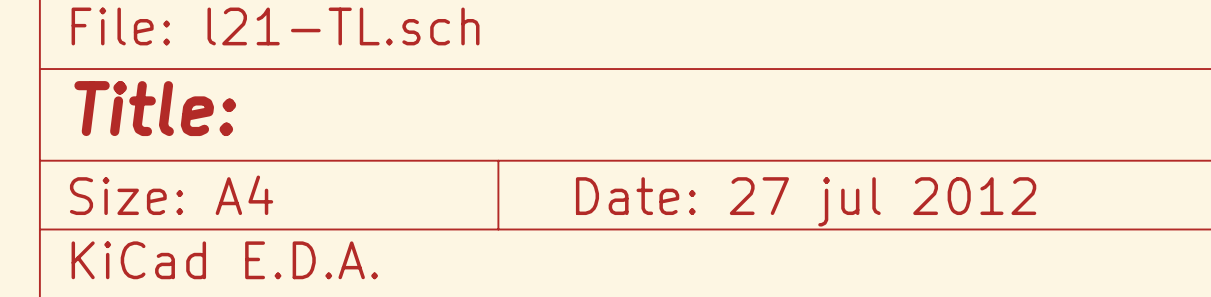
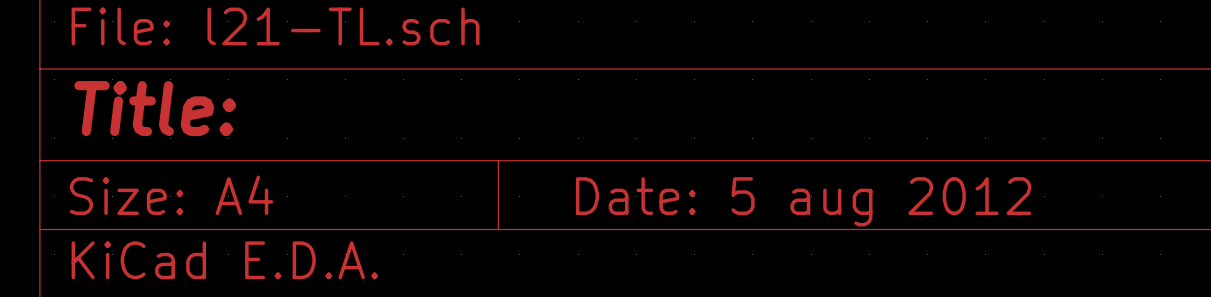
title block: Date: 27 jul 2012 (806, 201) -> Date: 5 aug 2012 (803, 201)

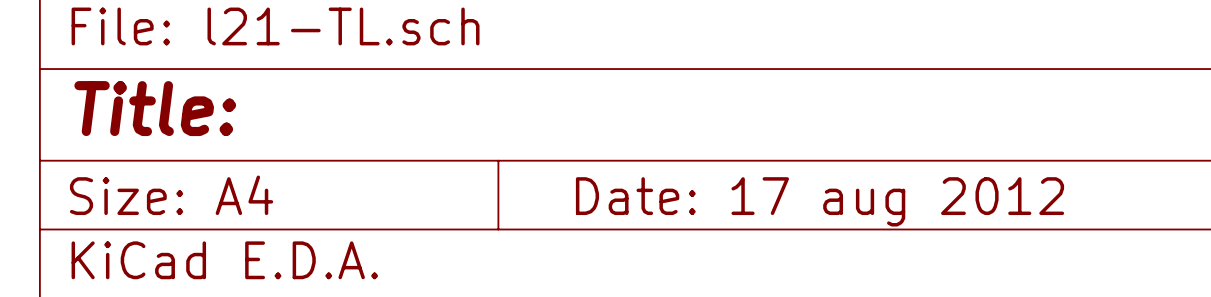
title block: Date: 5 aug 2012 (803, 201) -> Date: 17 aug 2012 (820, 201)

